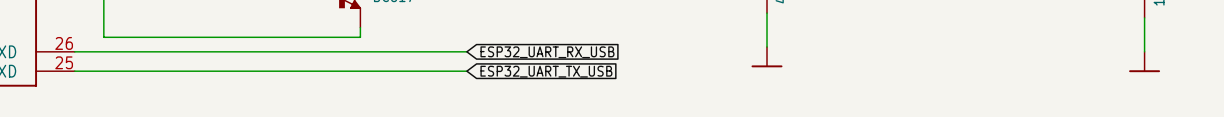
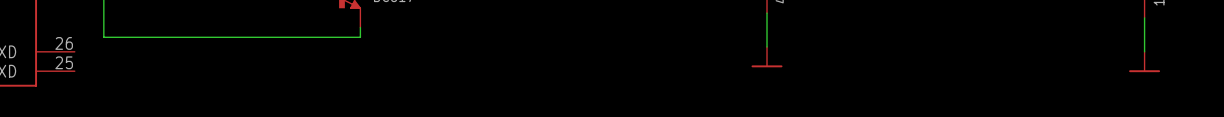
wire: (74, 51) (466, 51) -> none
global label: ESP32_UART_RX_USB (547, 52) -> none
wire: (74, 71) (466, 71) -> none
global label: ESP32_UART_TX_USB (546, 71) -> none

